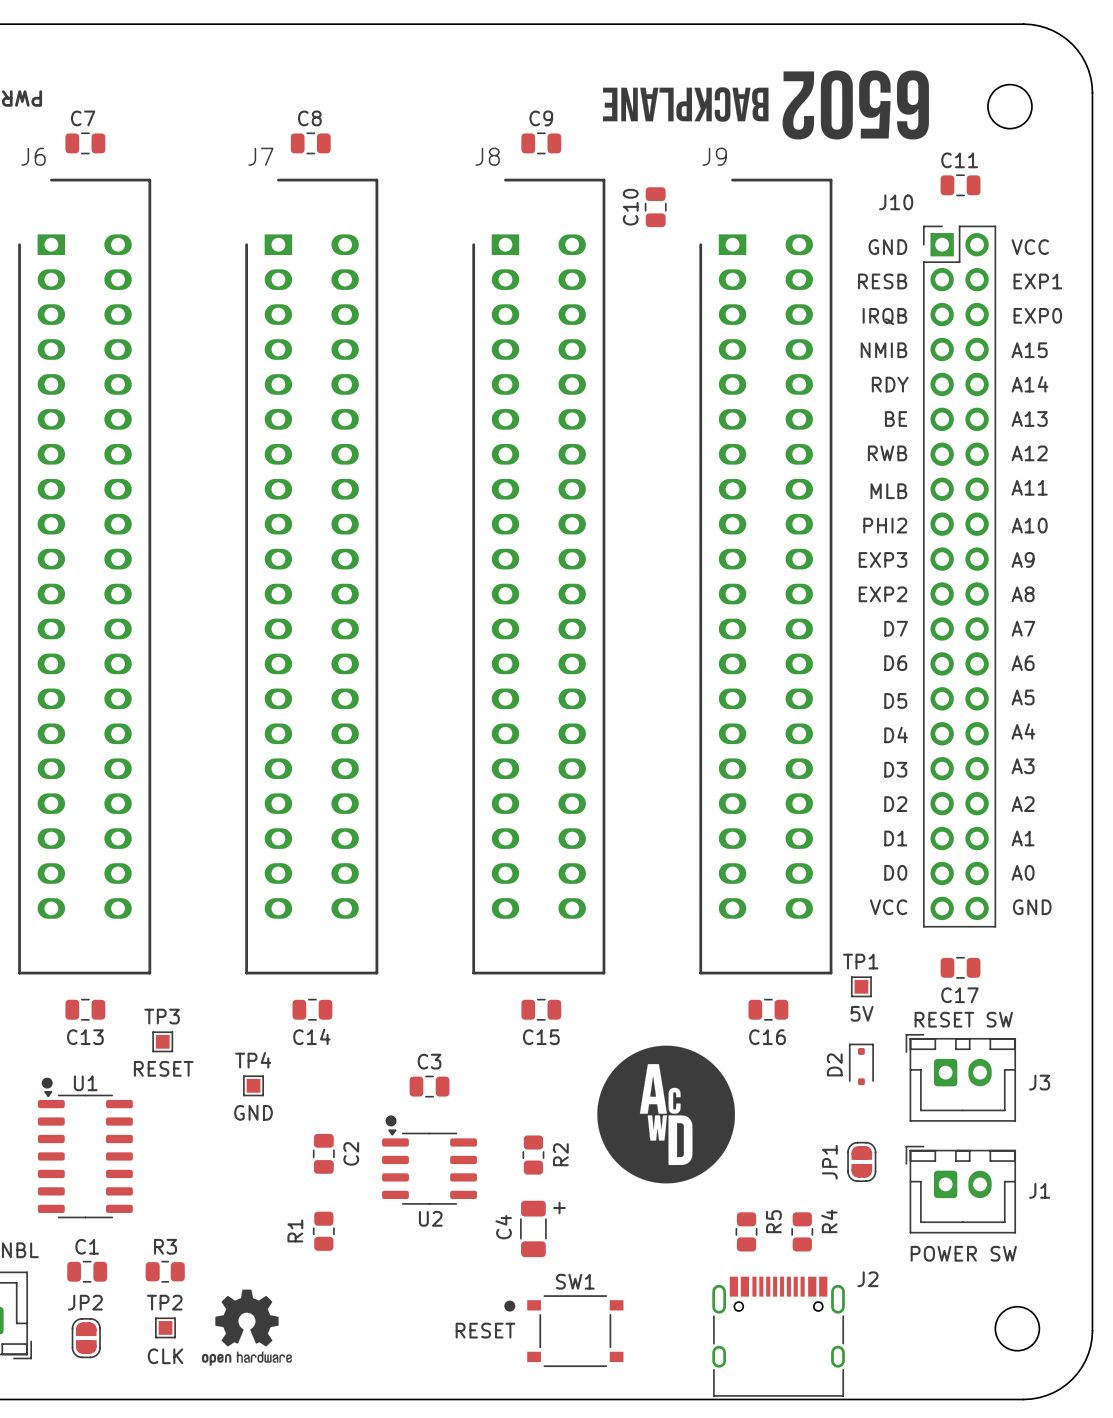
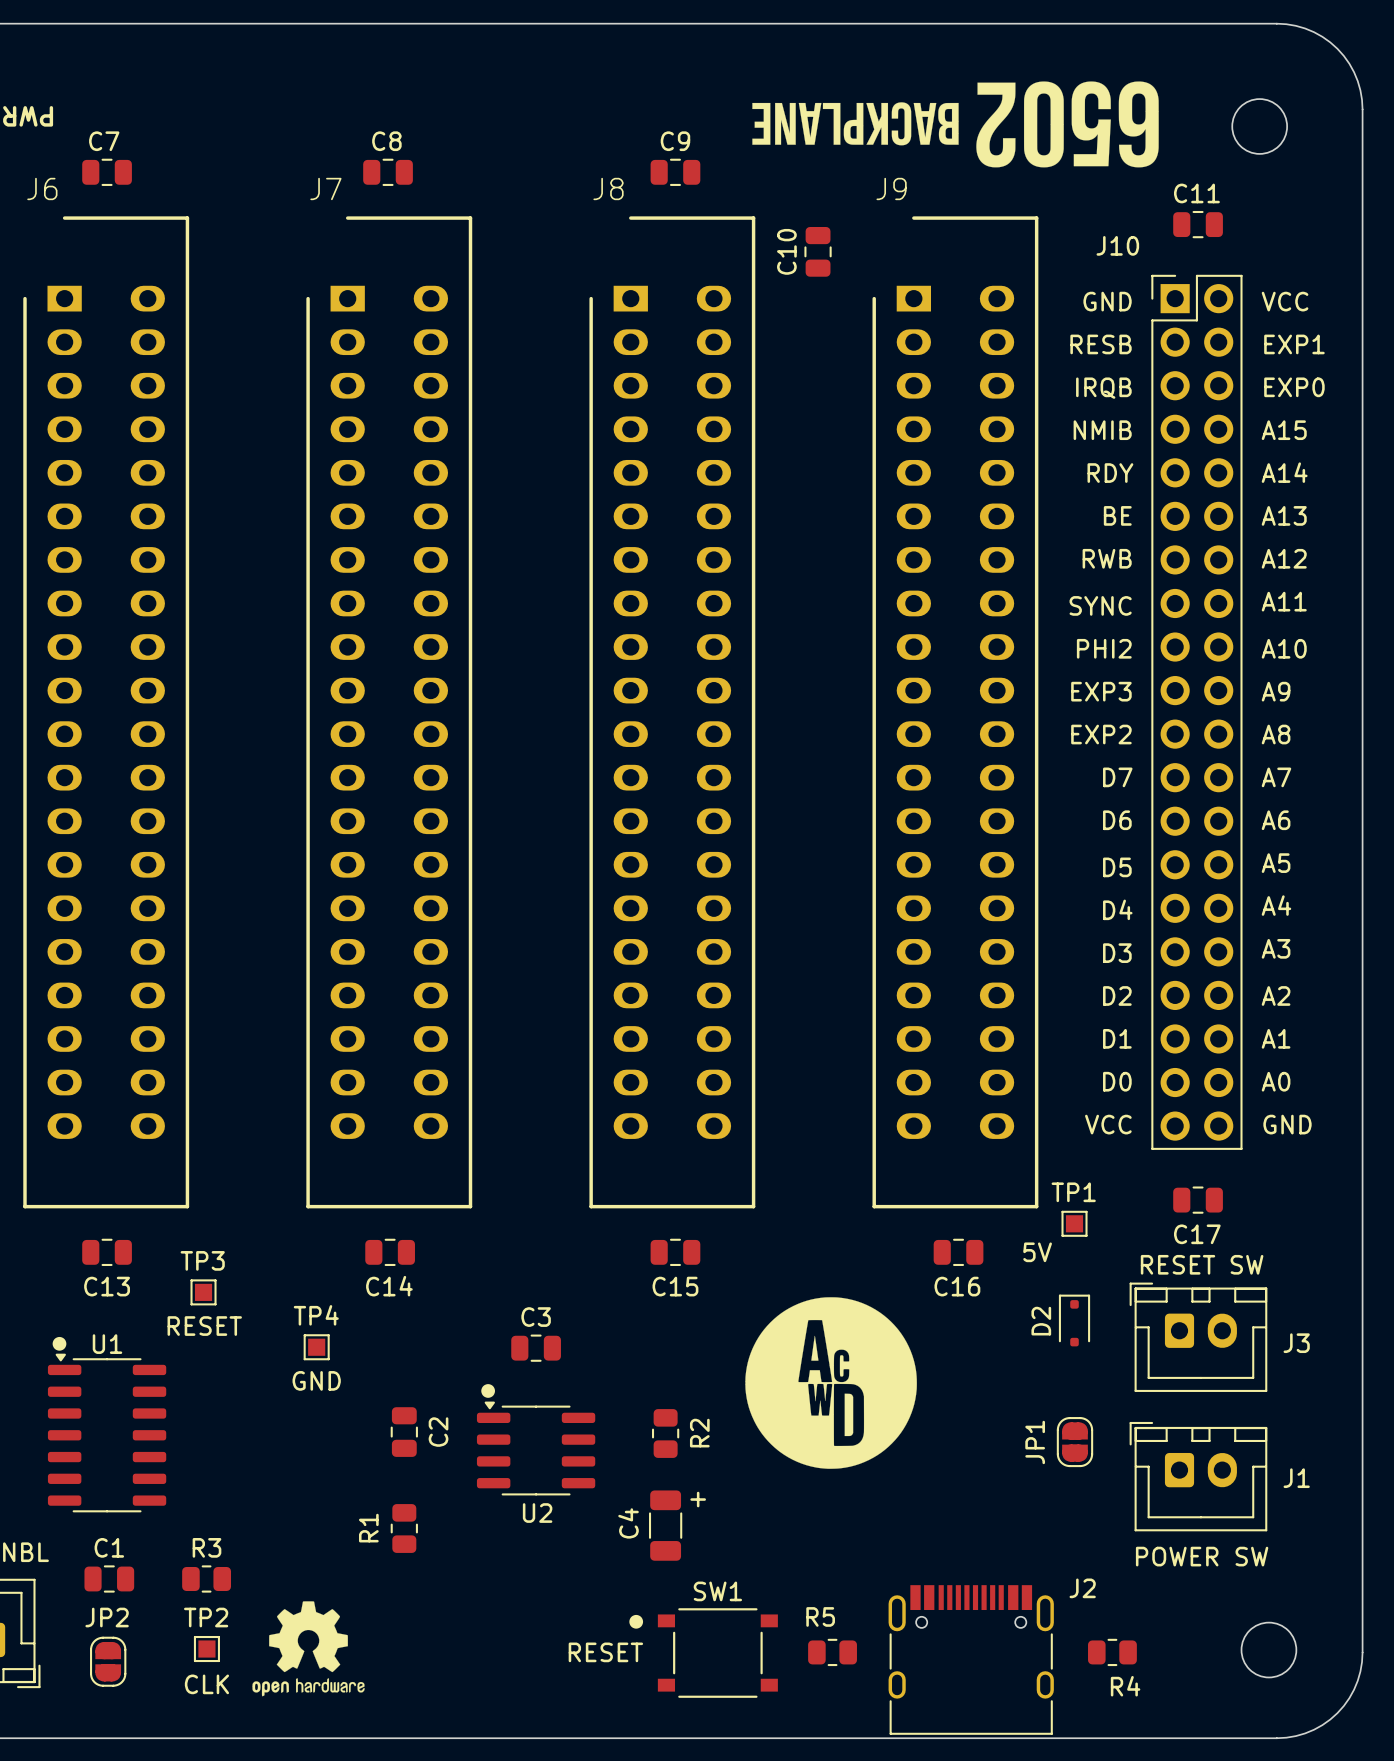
text: MLB (888, 491) -> SYNC (1100, 605)
TP1 value position: 5V (862, 1013) -> 5V (1037, 1252)
R5 name position: R5 (773, 1221) -> R5 (820, 1616)
R5 rotation: 0° (746, 1231) -> 90° clockwise (832, 1652)
R5 position: (746, 1231) -> (832, 1652)
R4 rotation: 0° (802, 1231) -> 90° clockwise (1112, 1652)
R4 position: (802, 1231) -> (1112, 1652)

